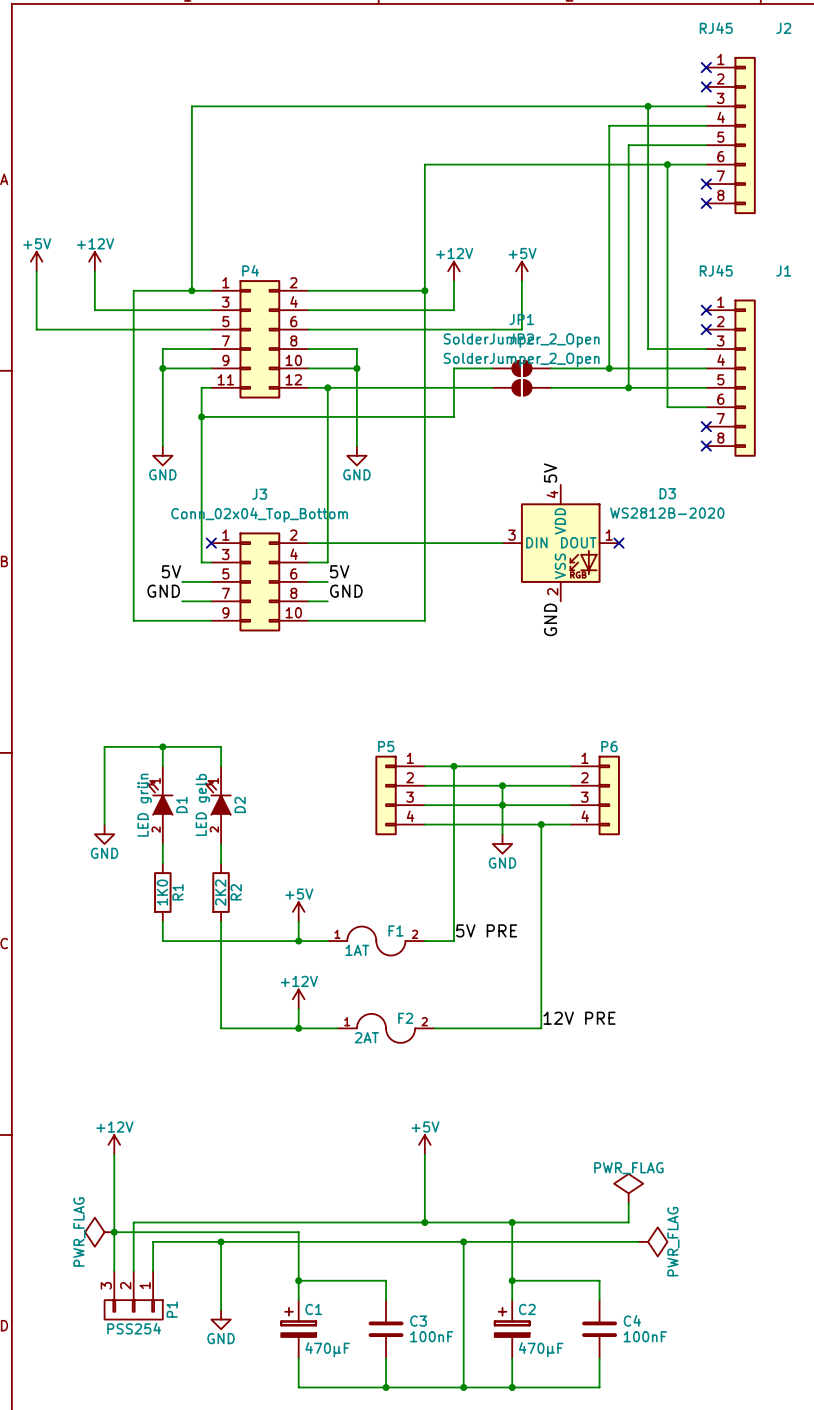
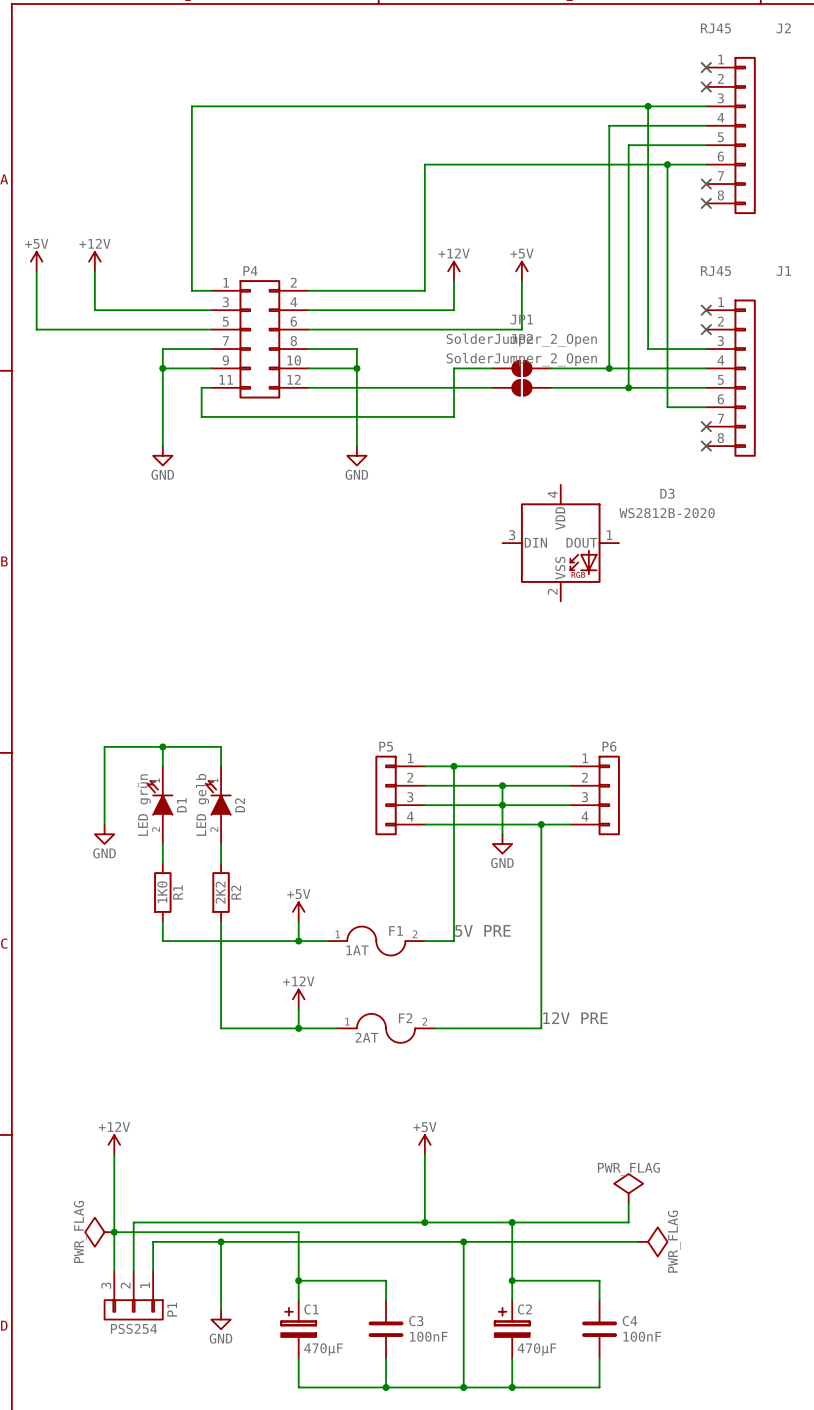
wire: (191, 290) (133, 290) (133, 620) (211, 620) -> none
junction: (191, 290) -> none
wire: (424, 290) (424, 620) (308, 620) -> none
junction: (424, 290) -> none
wire: (327, 387) (327, 562) (308, 562) -> none
junction: (327, 387) -> none
wire: (201, 416) (201, 562) (211, 562) -> none
junction: (201, 416) -> none
label: 5V (550, 473) -> none
no-connect mark: (211, 543) -> none
wire: (308, 543) (502, 543) -> none
no-connect mark: (618, 543) -> none
label: 5V (171, 571) -> none
label: 5V (339, 571) -> none
wire: (182, 581) (211, 581) -> none
J3: Conn_02x04_Top_Bottom (259, 581) -> none
wire: (308, 581) (327, 581) -> none
label: GND (163, 591) -> none
label: GND (346, 591) -> none
wire: (182, 601) (211, 601) -> none
wire: (308, 601) (327, 601) -> none
label: GND (550, 619) -> none

